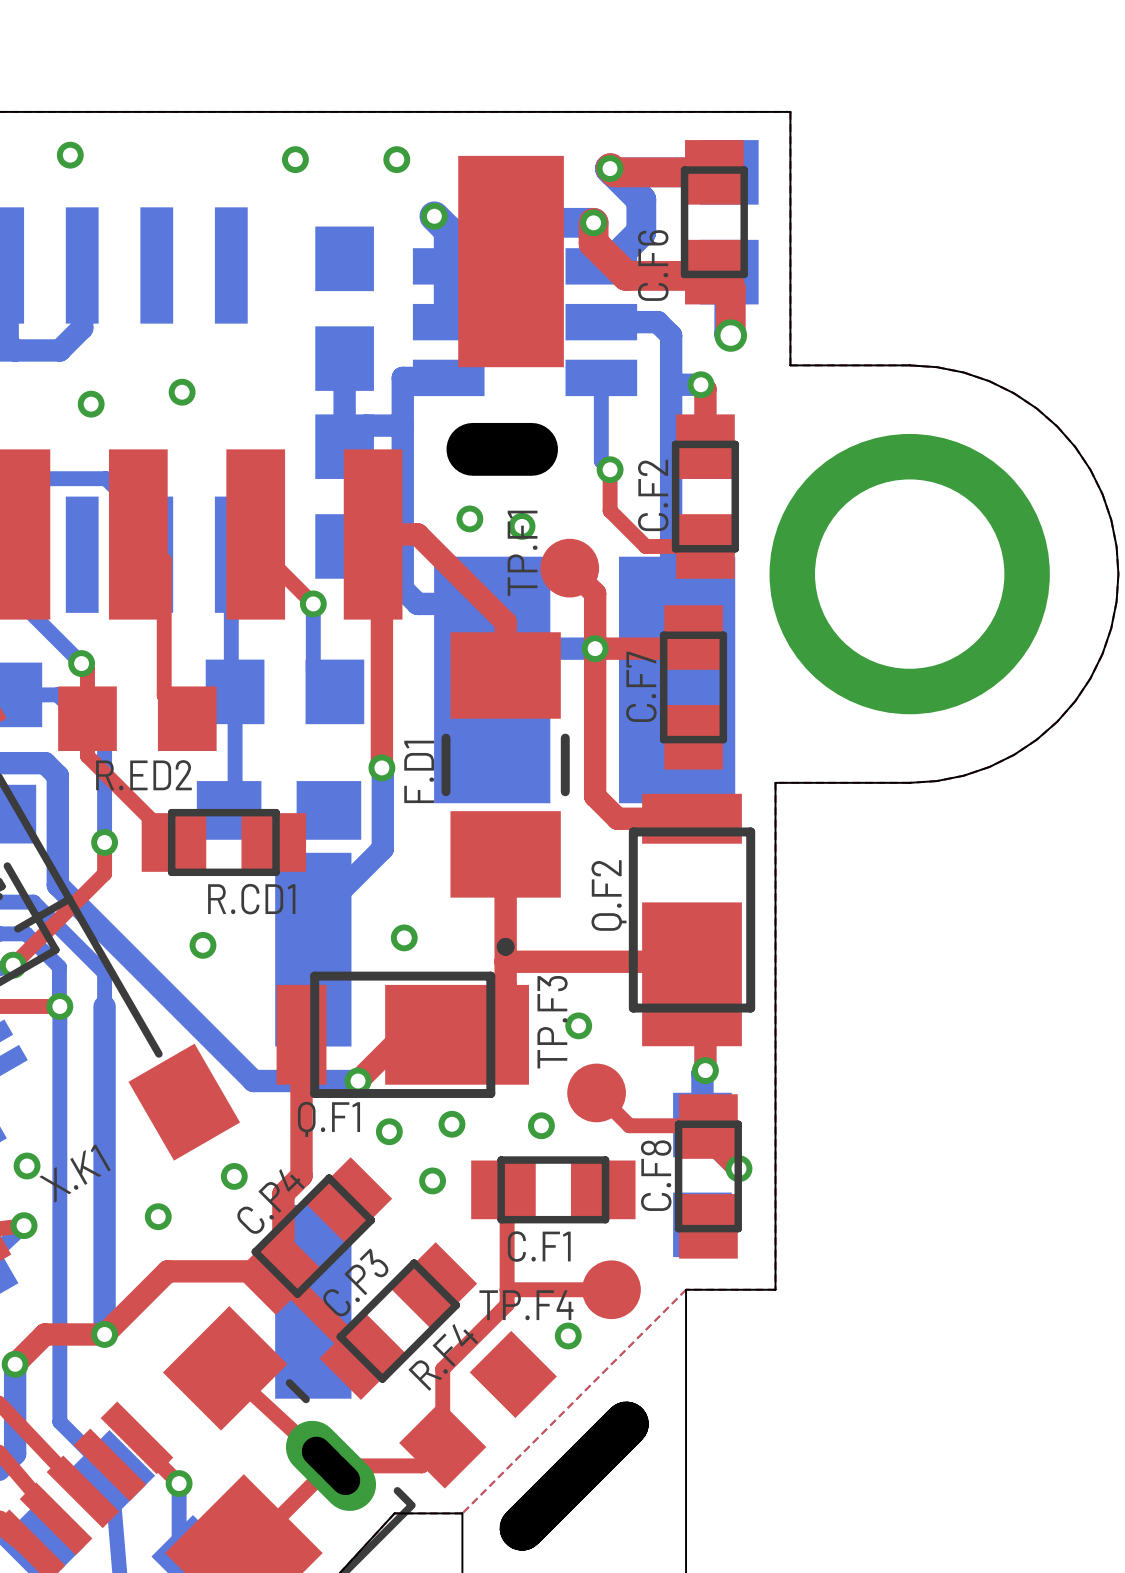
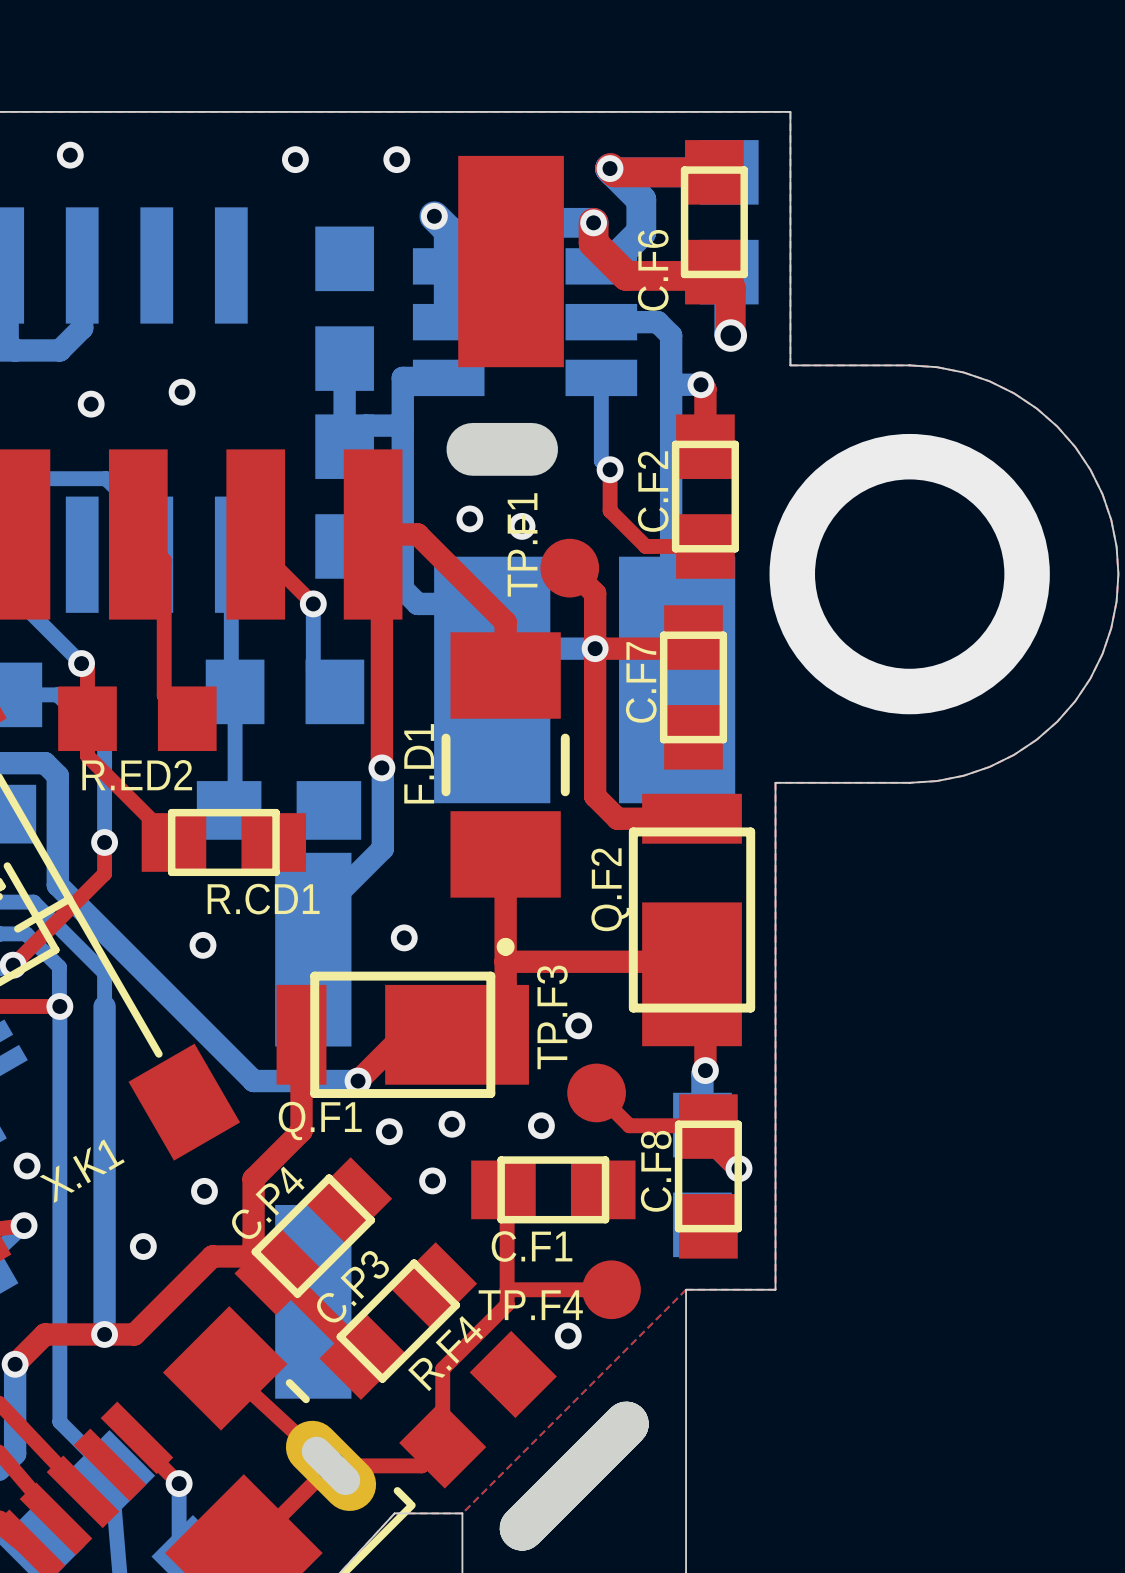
top track: (301, 1131) (301, 1175) (283, 1193) (283, 1266) (278, 1271) (167, 1271) (104, 1334) -> (263, 1256) (212, 1256) (134, 1334) (104, 1334)
top track: none -> (301, 1131) (253, 1179) (253, 1246) (278, 1271)
via: (234, 1176) -> none
via: none -> (204, 1191)
via: (158, 1216) -> none
via: none -> (143, 1246)

